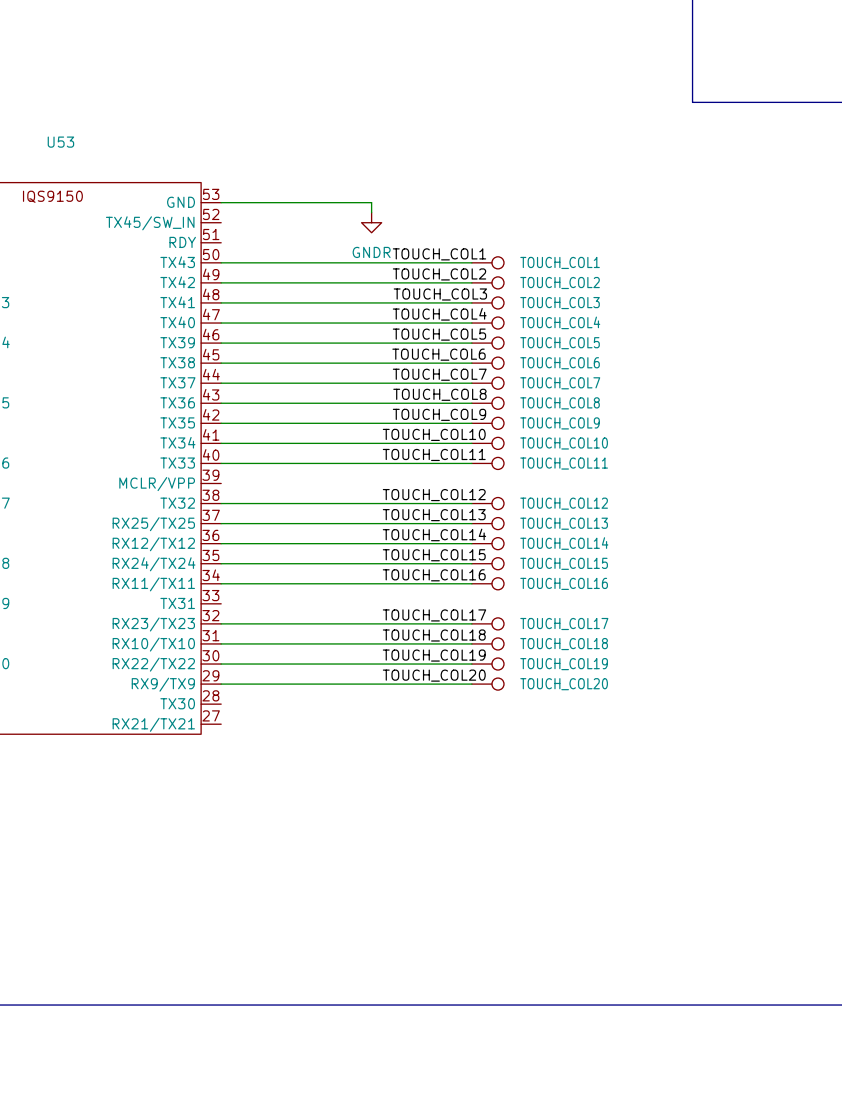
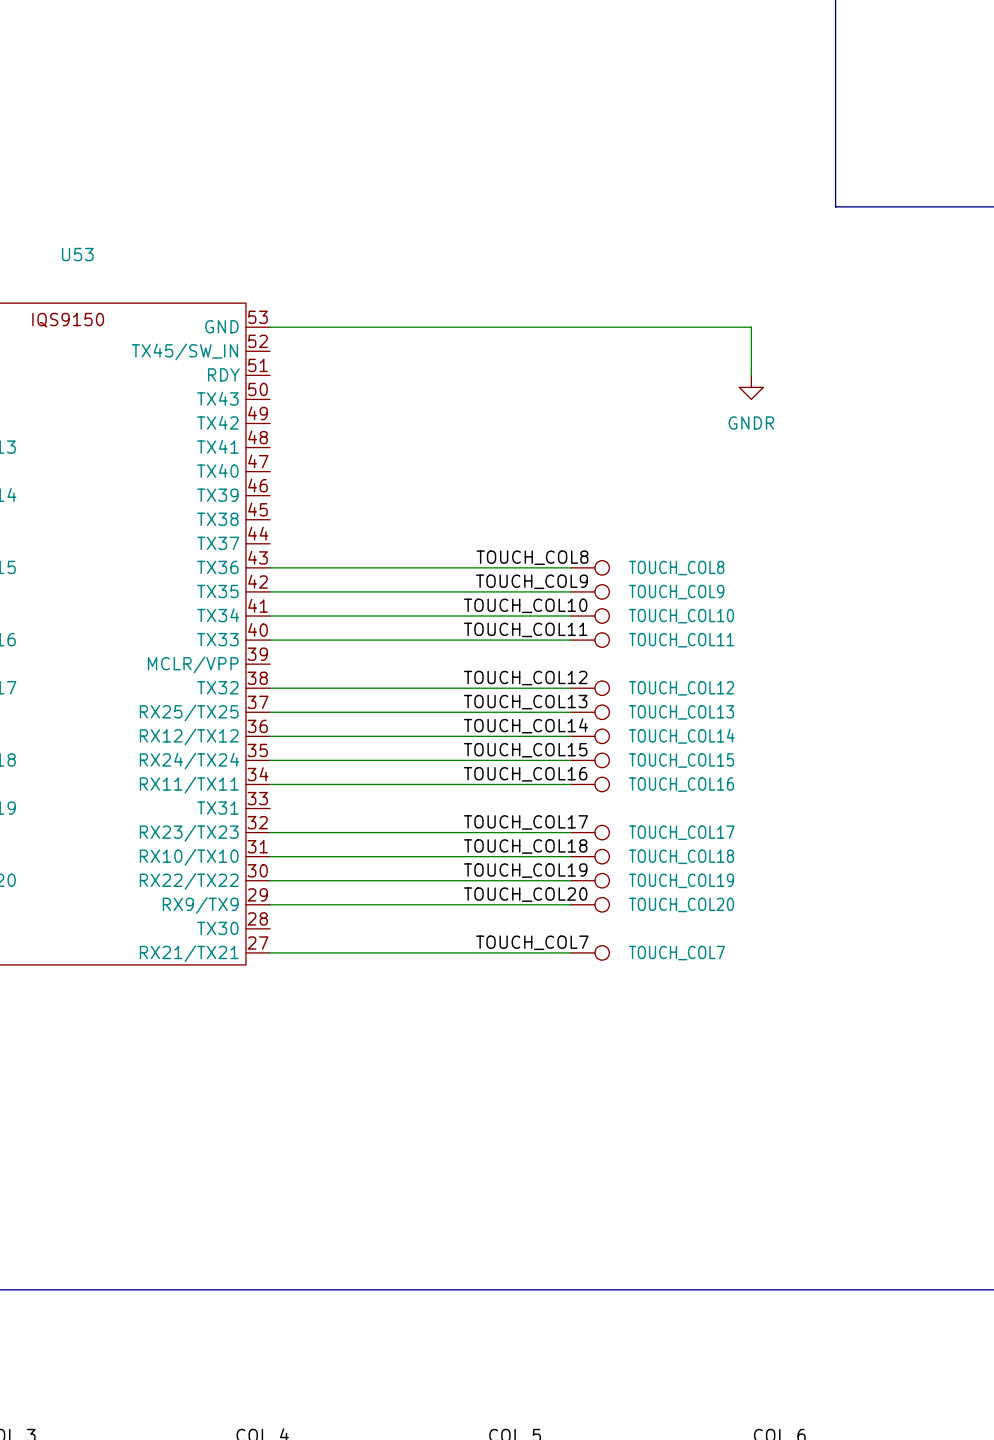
wire: (371, 202) (371, 212) -> (450, 327) (751, 327) (751, 375)
power symbol: GNDR (371, 222) -> none
power symbol: none -> GNDR (751, 387)
label: TOUCH_COL1 (439, 254) -> none
wire: (221, 262) (471, 262) -> none
TOUCH_COL1: (487, 262) -> none
label: TOUCH_COL2 (439, 274) -> none
wire: (221, 282) (471, 282) -> none
TOUCH_COL2: (487, 282) -> none
label: TOUCH_COL3 (440, 294) -> none
wire: (221, 302) (471, 302) -> none
TOUCH_COL3: (487, 302) -> none
label: TOUCH_COL4 (439, 314) -> none
wire: (221, 323) (471, 323) -> none
TOUCH_COL4: (487, 323) -> none
label: TOUCH_COL5 (439, 334) -> none
wire: (221, 343) (471, 343) -> none
TOUCH_COL5: (487, 343) -> none
label: TOUCH_COL6 (439, 354) -> none
wire: (221, 363) (471, 363) -> none
TOUCH_COL6: (487, 363) -> none
label: TOUCH_COL7 (439, 374) -> none
wire: (221, 383) (471, 383) -> none
TOUCH_COL7 position: (487, 383) -> (590, 952)
label: none -> TOUCH_COL7 (532, 942)
wire: none -> (270, 952) (570, 952)

